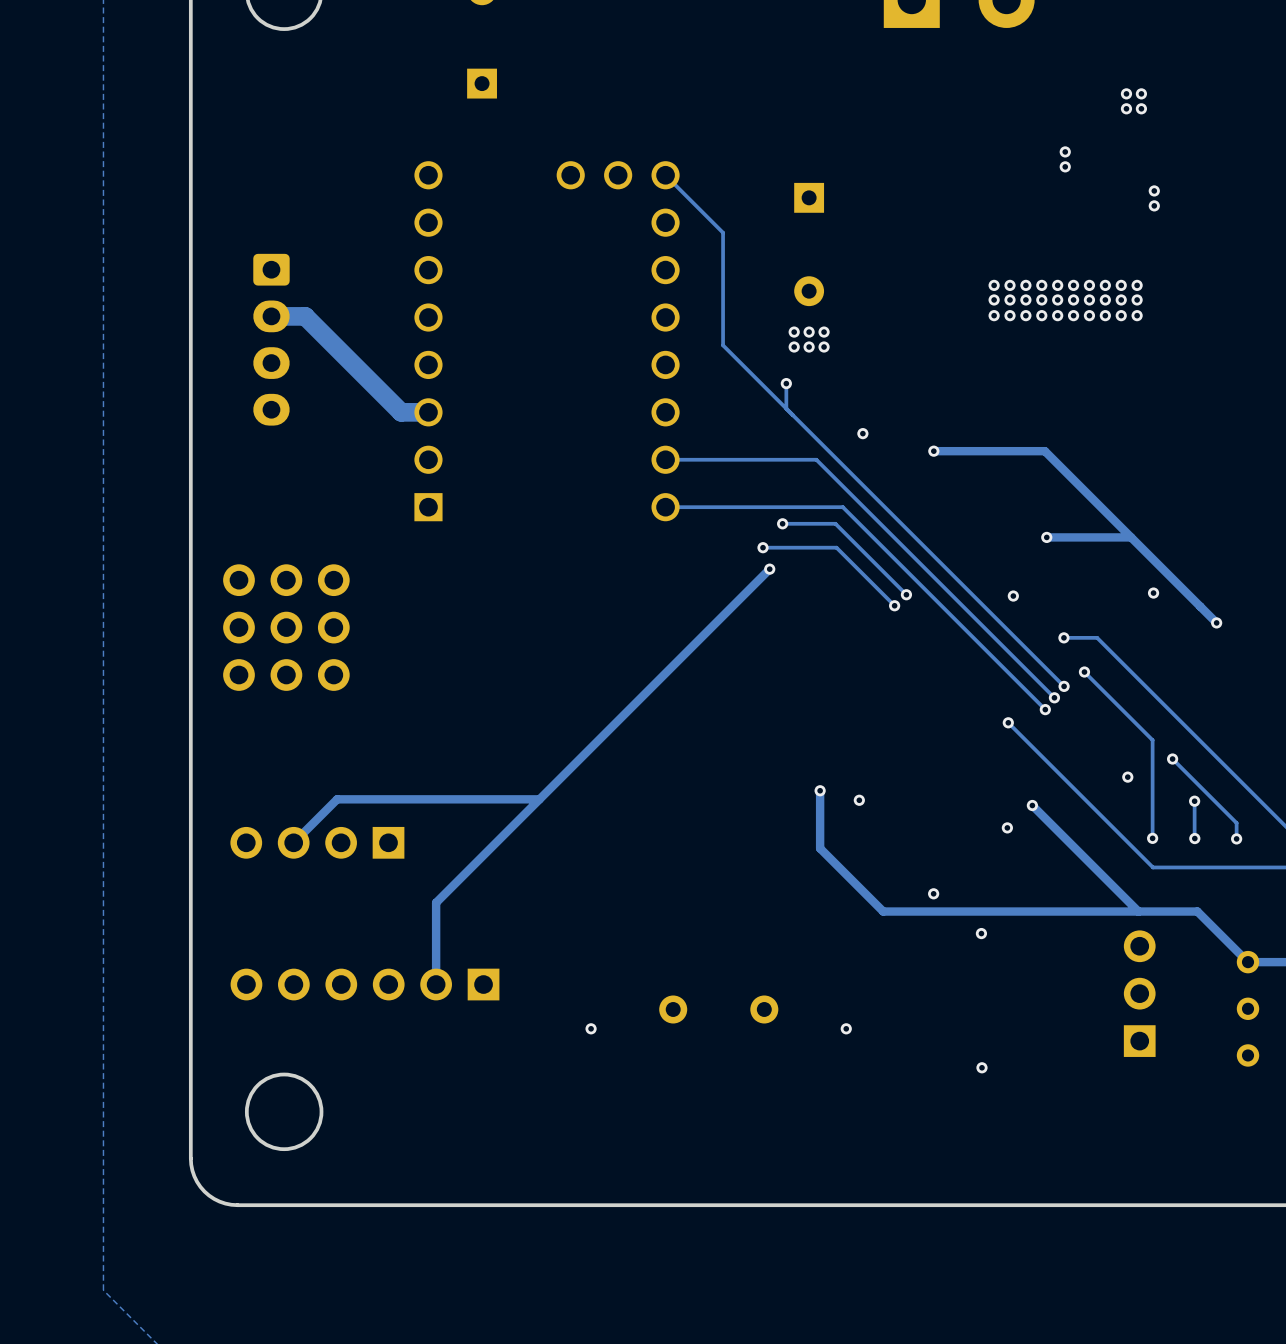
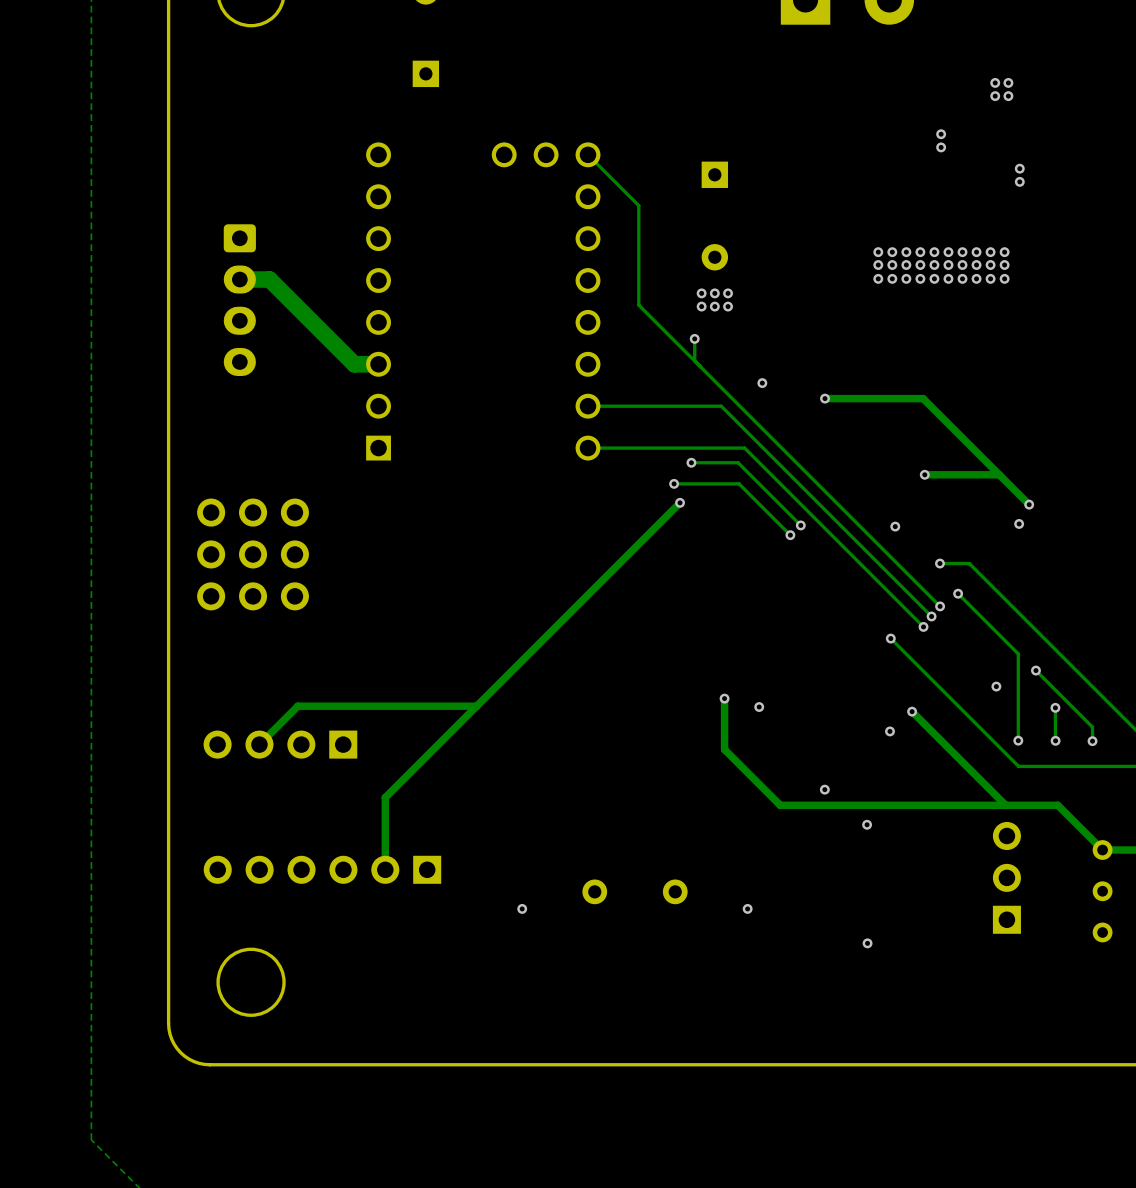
track: (1164, 571) (1216, 622) -> none
via: none -> (1029, 504)
via: (1216, 622) -> none

